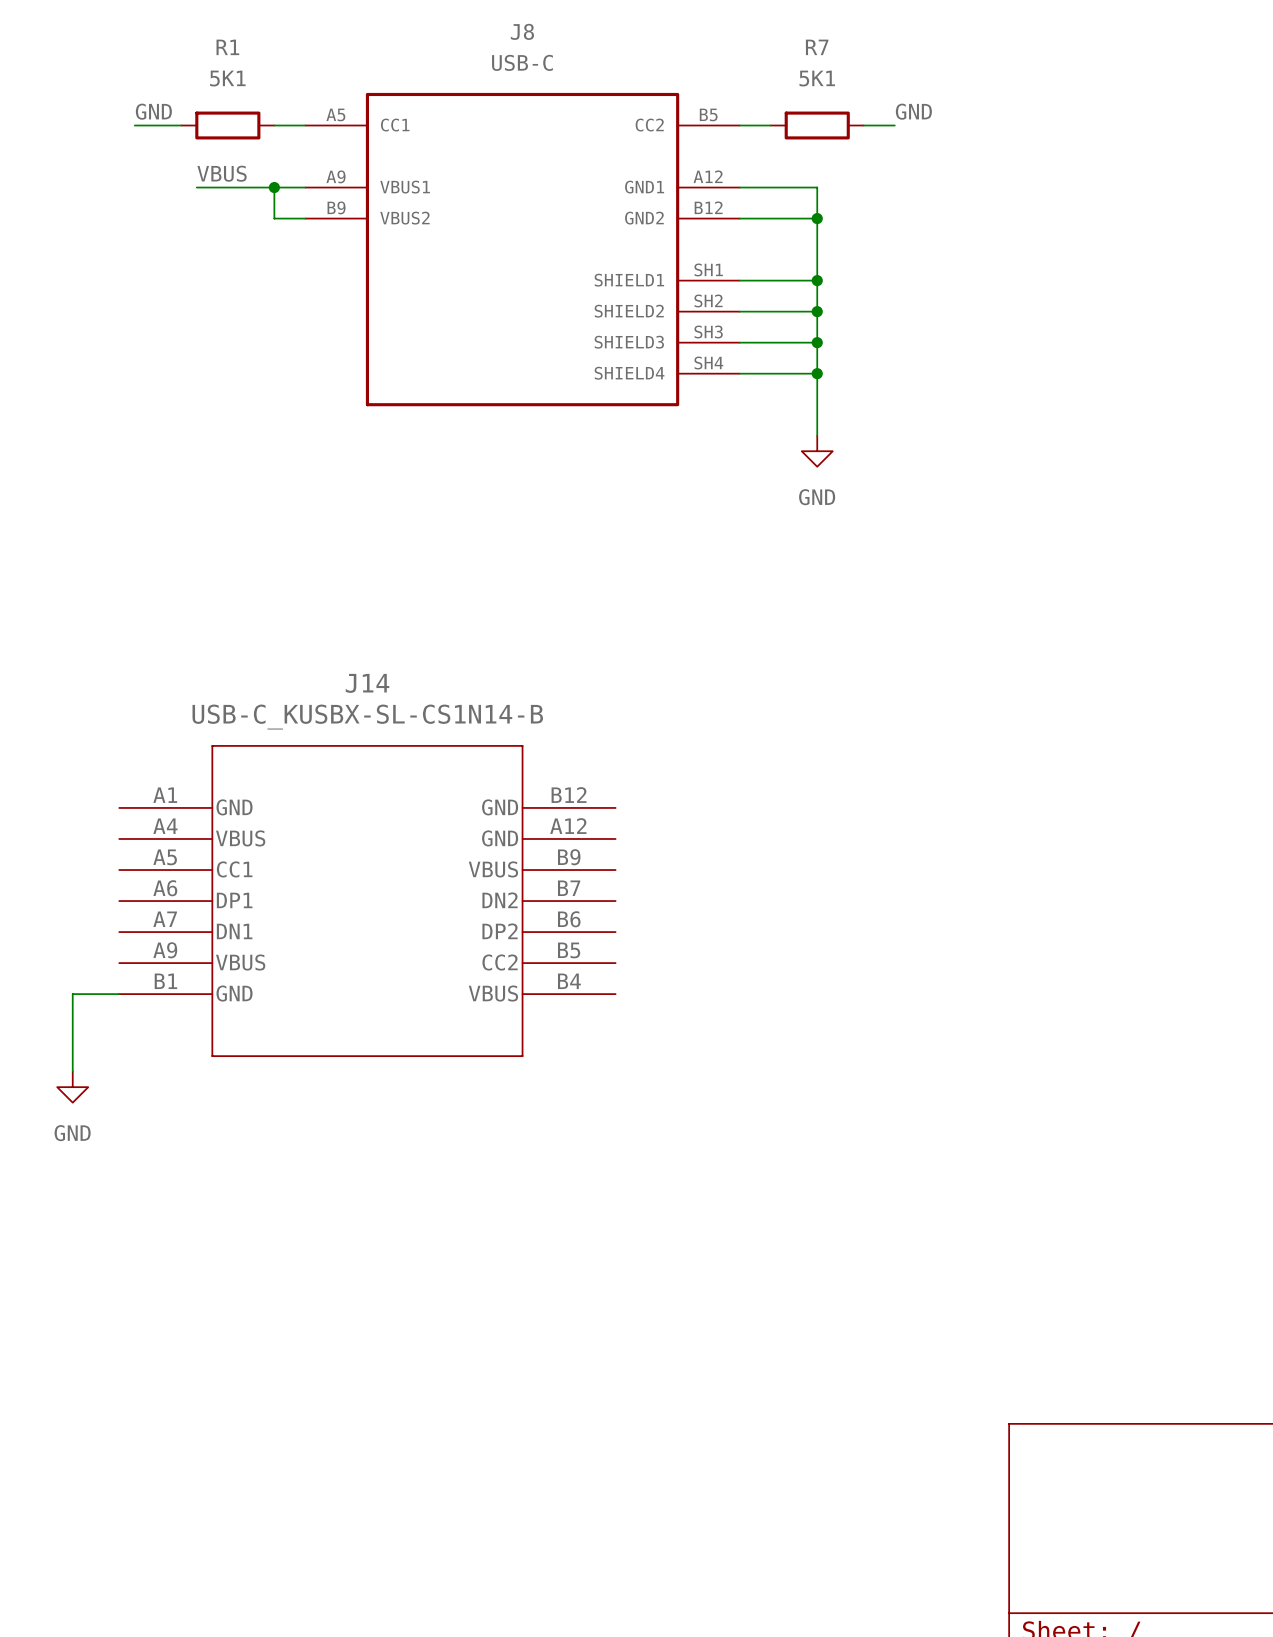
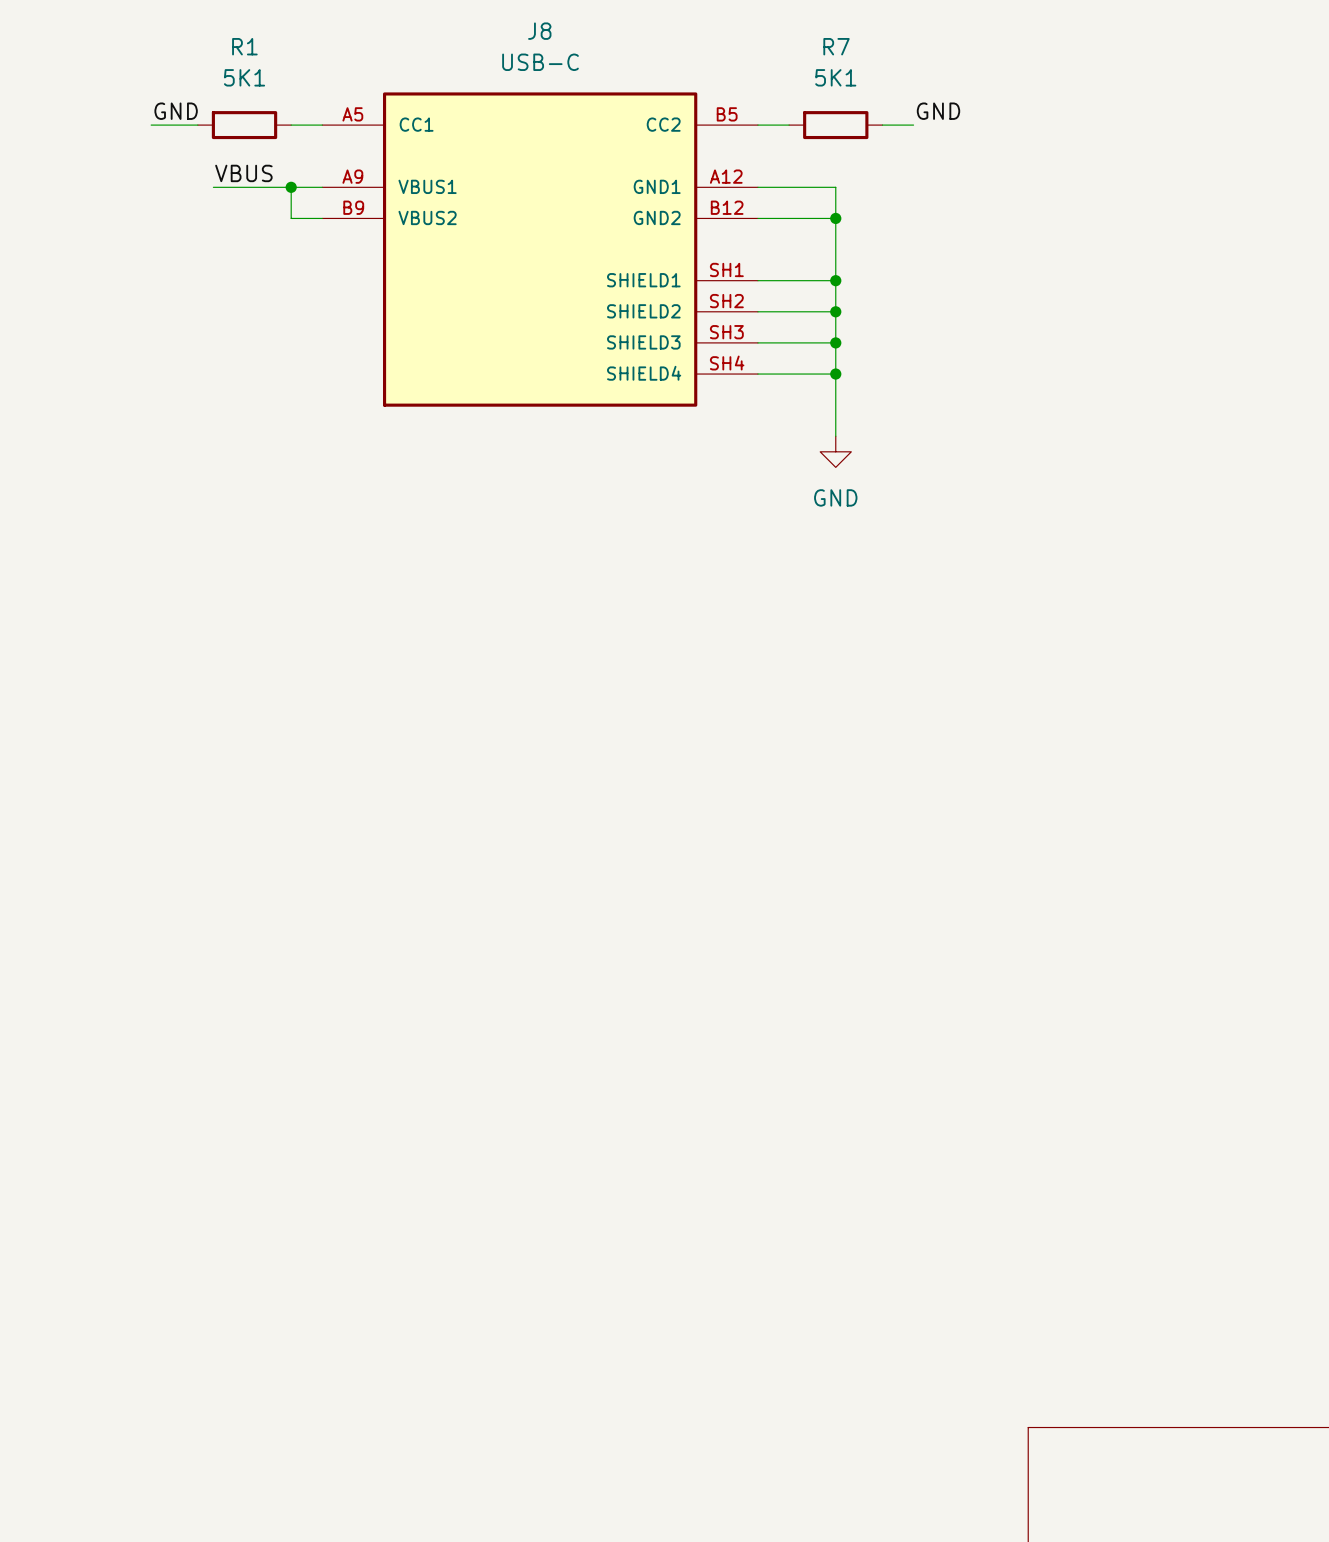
J14: USB-C_KUSBX-SL-CS1N14-B (367, 901) -> none
wire: (119, 994) (72, 994) (72, 1071) -> none
power symbol: GND (72, 1087) -> none

